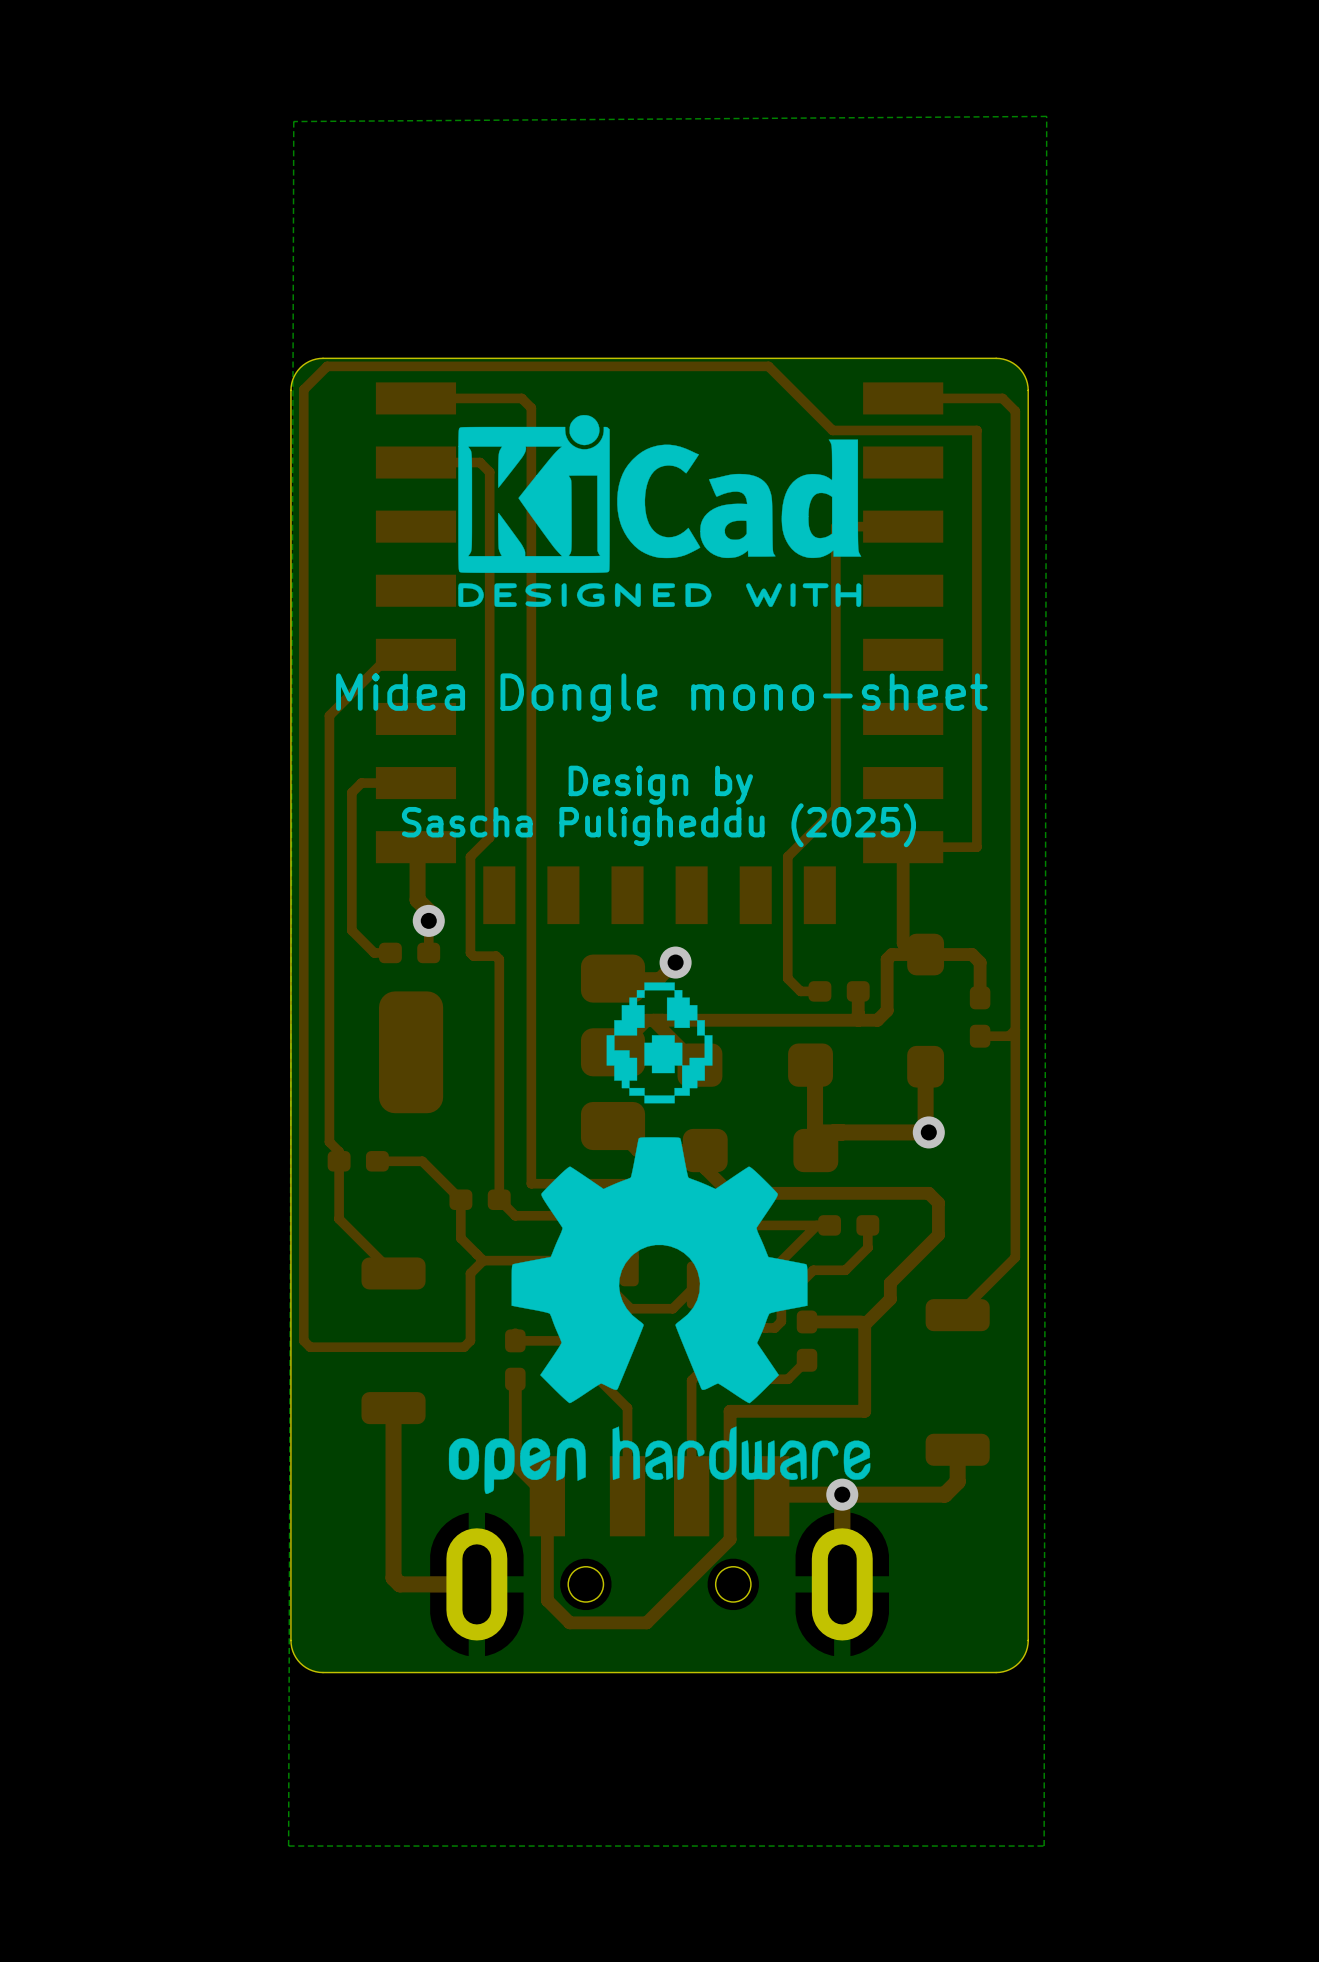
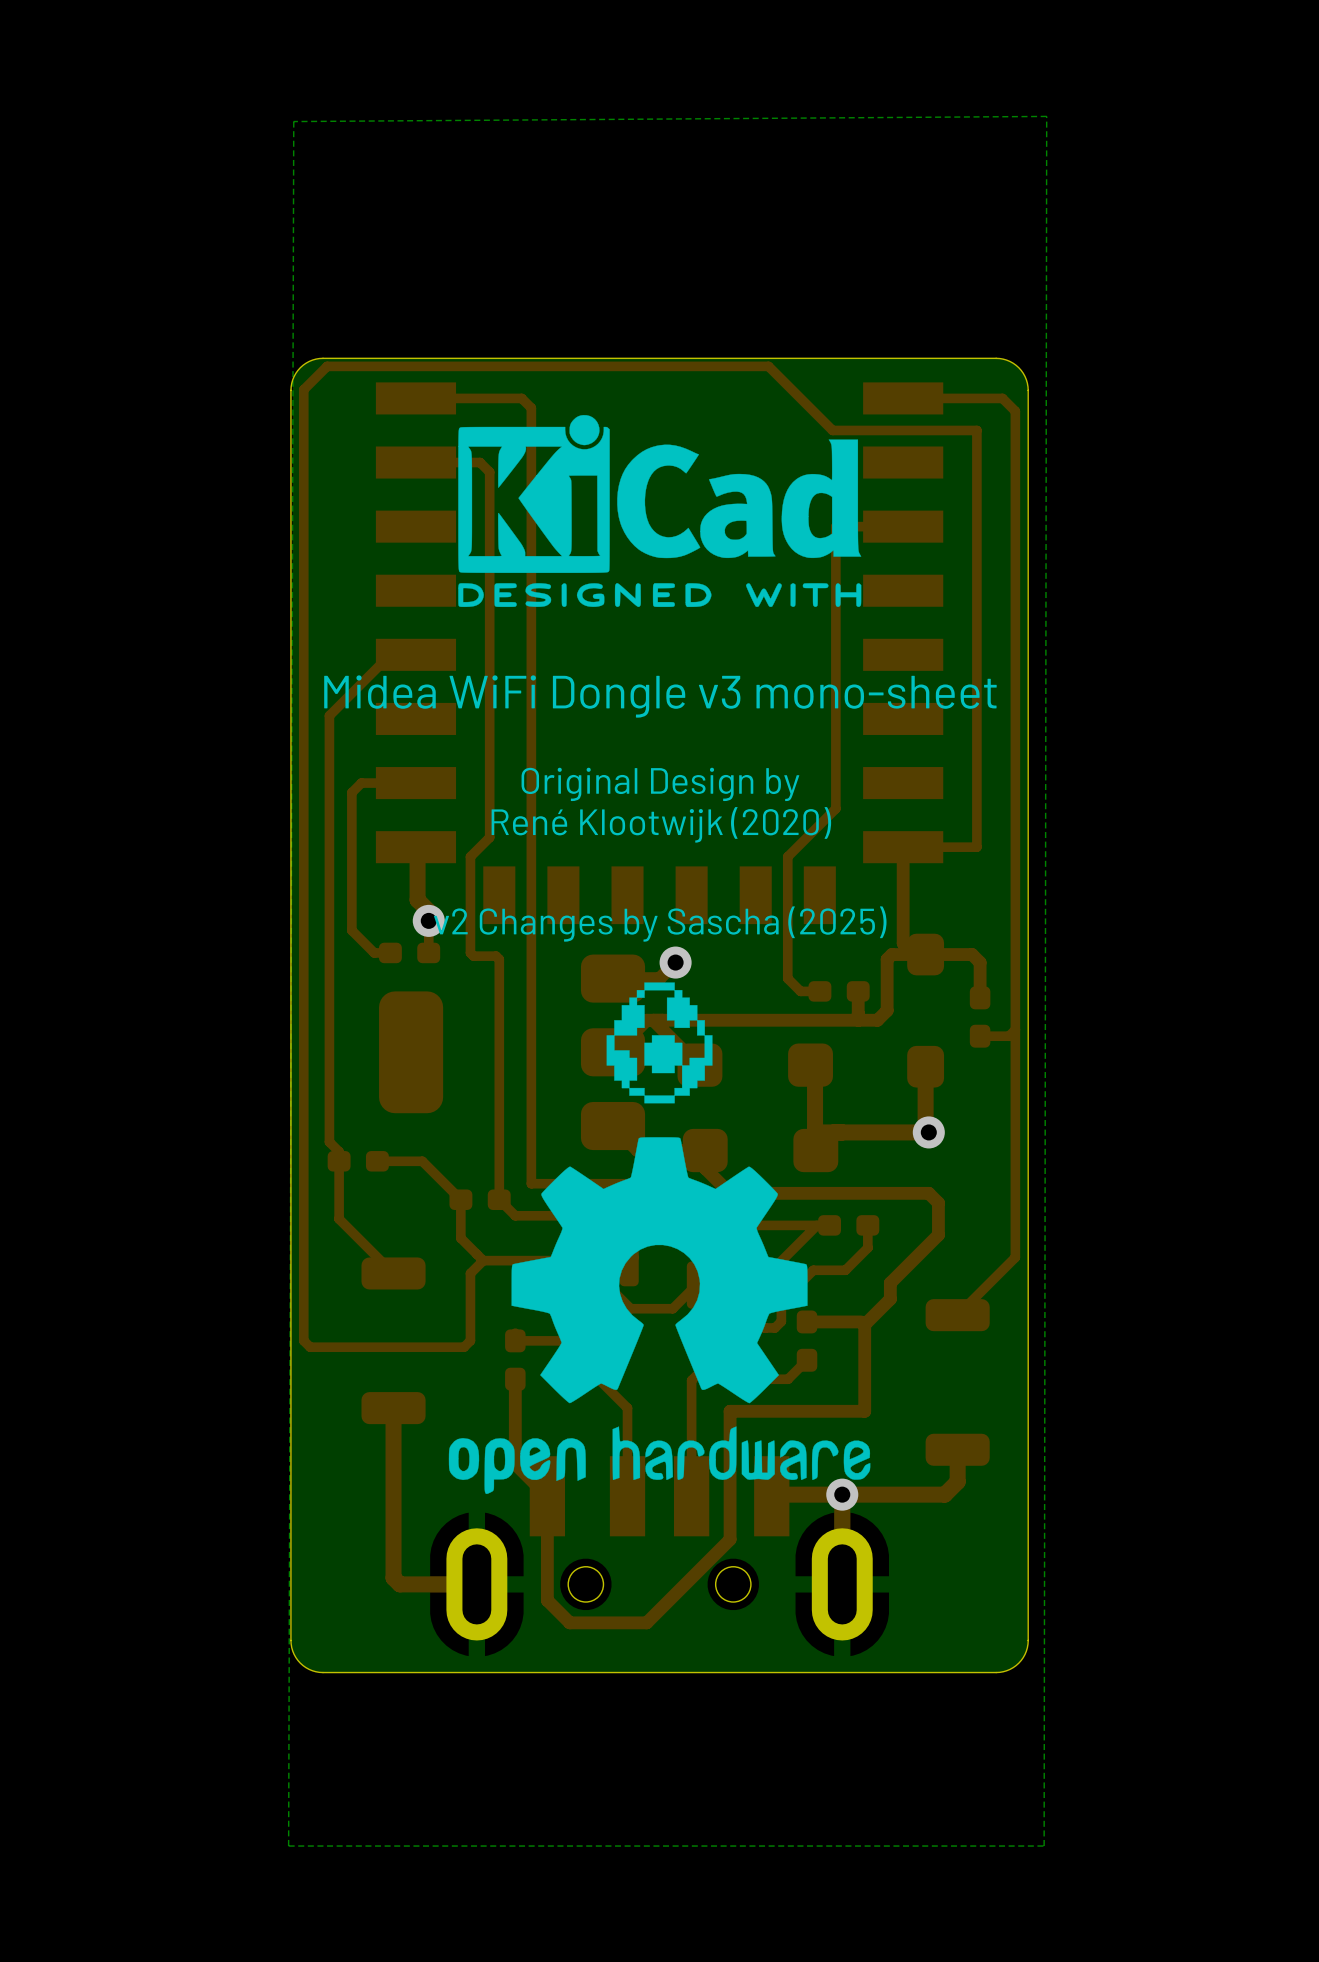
text: Midea Dongle mono-sheet (661, 697) -> Midea WiFi Dongle v3 mono-sheet (660, 696)
text: Design by (660, 785) -> Original Design by (660, 784)
text: Sascha Puligheddu (2025) (658, 825) -> René Klootwijk (2020) (661, 824)
text: none -> v2 Changes by Sascha (2025) (660, 924)

